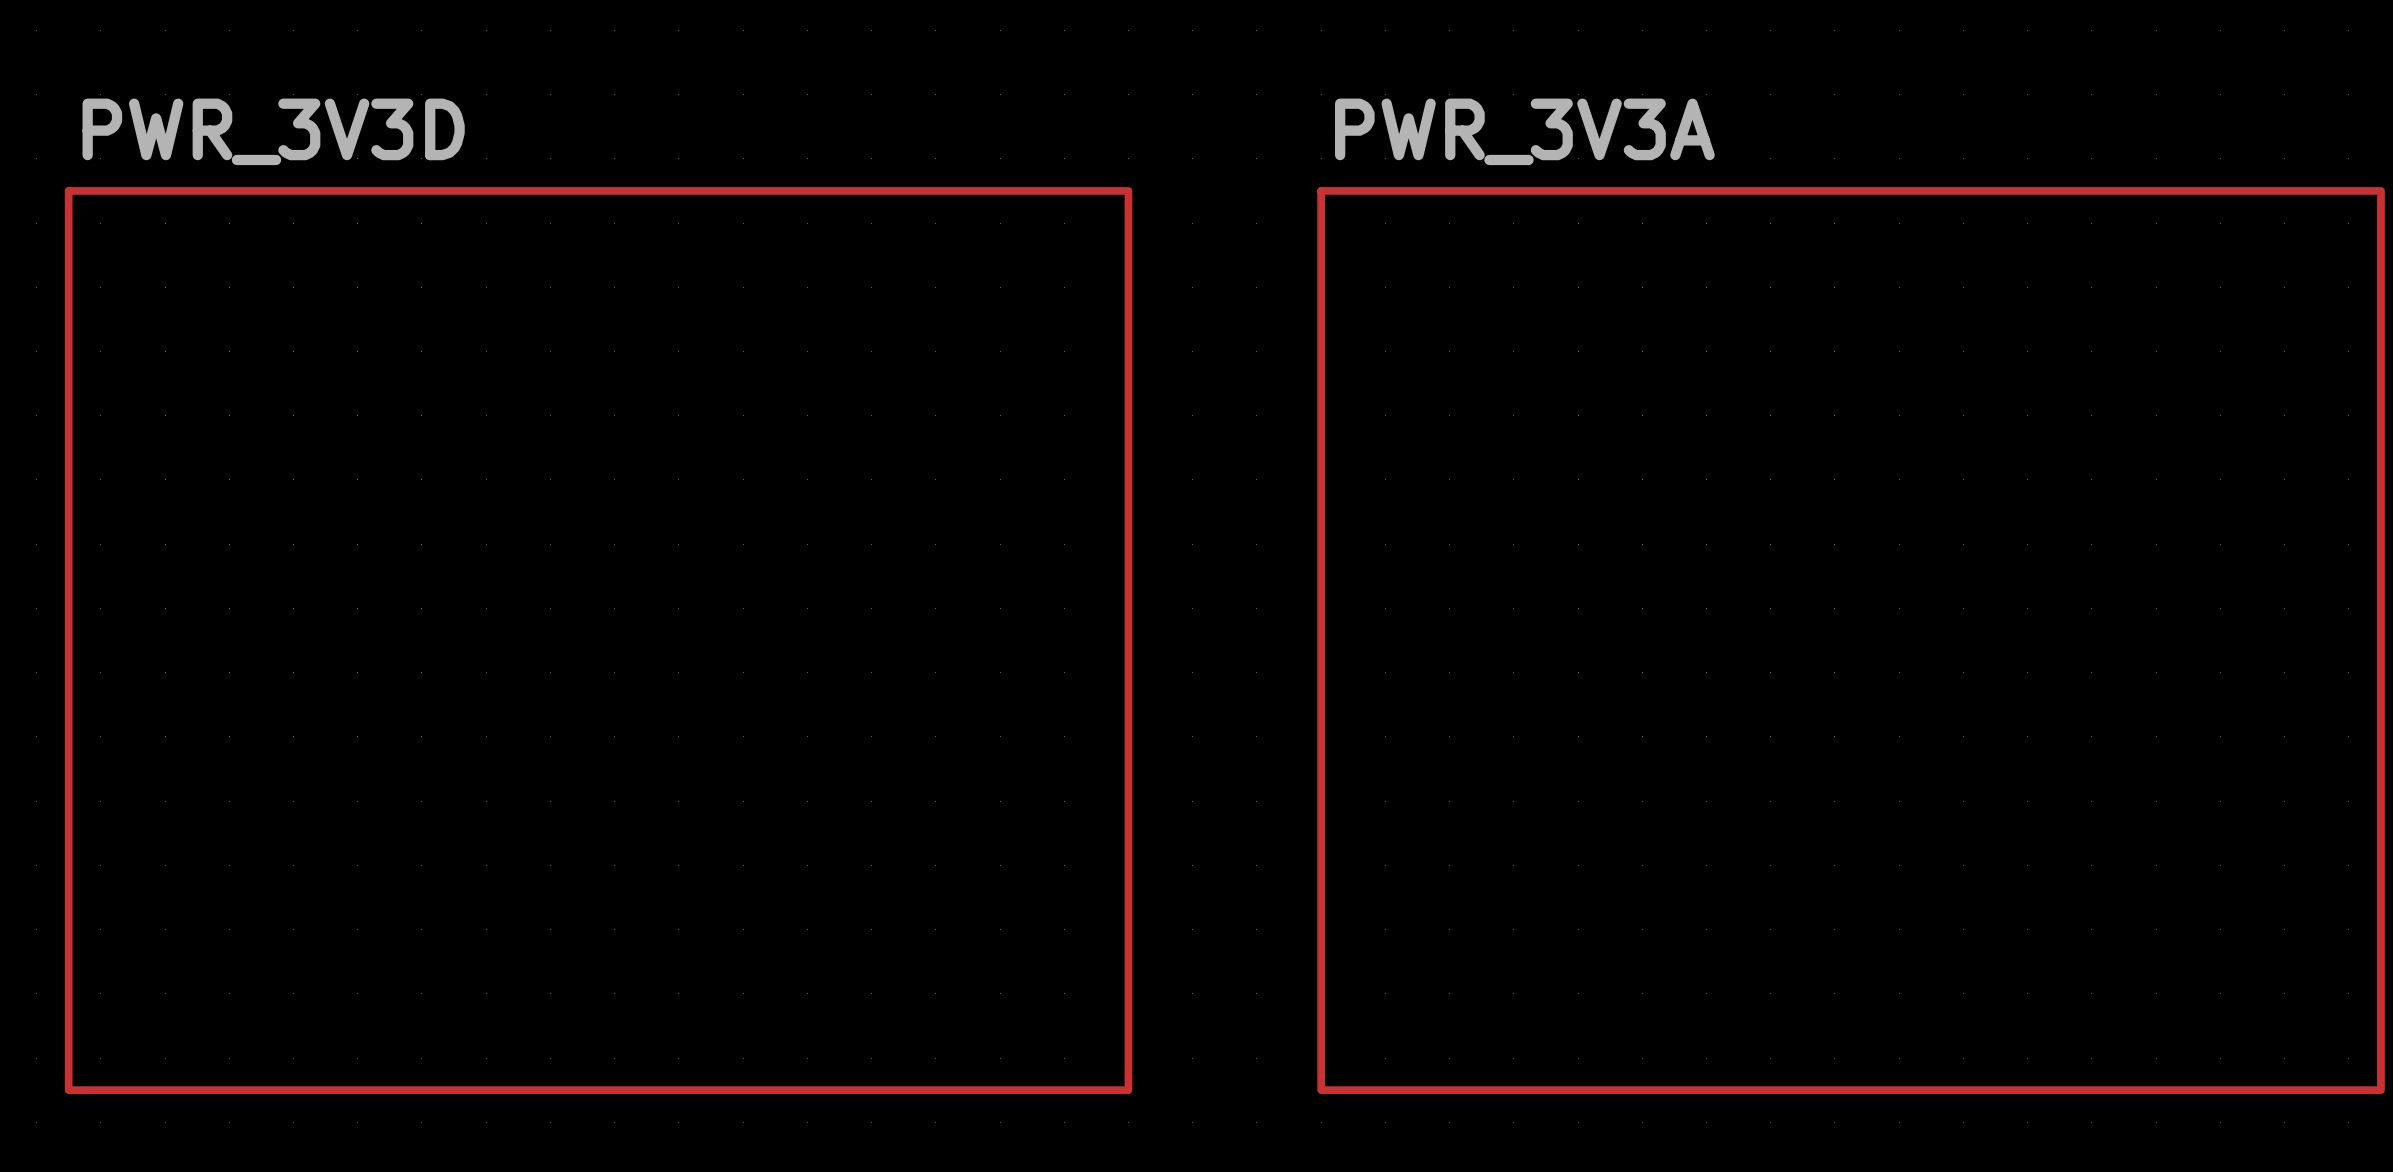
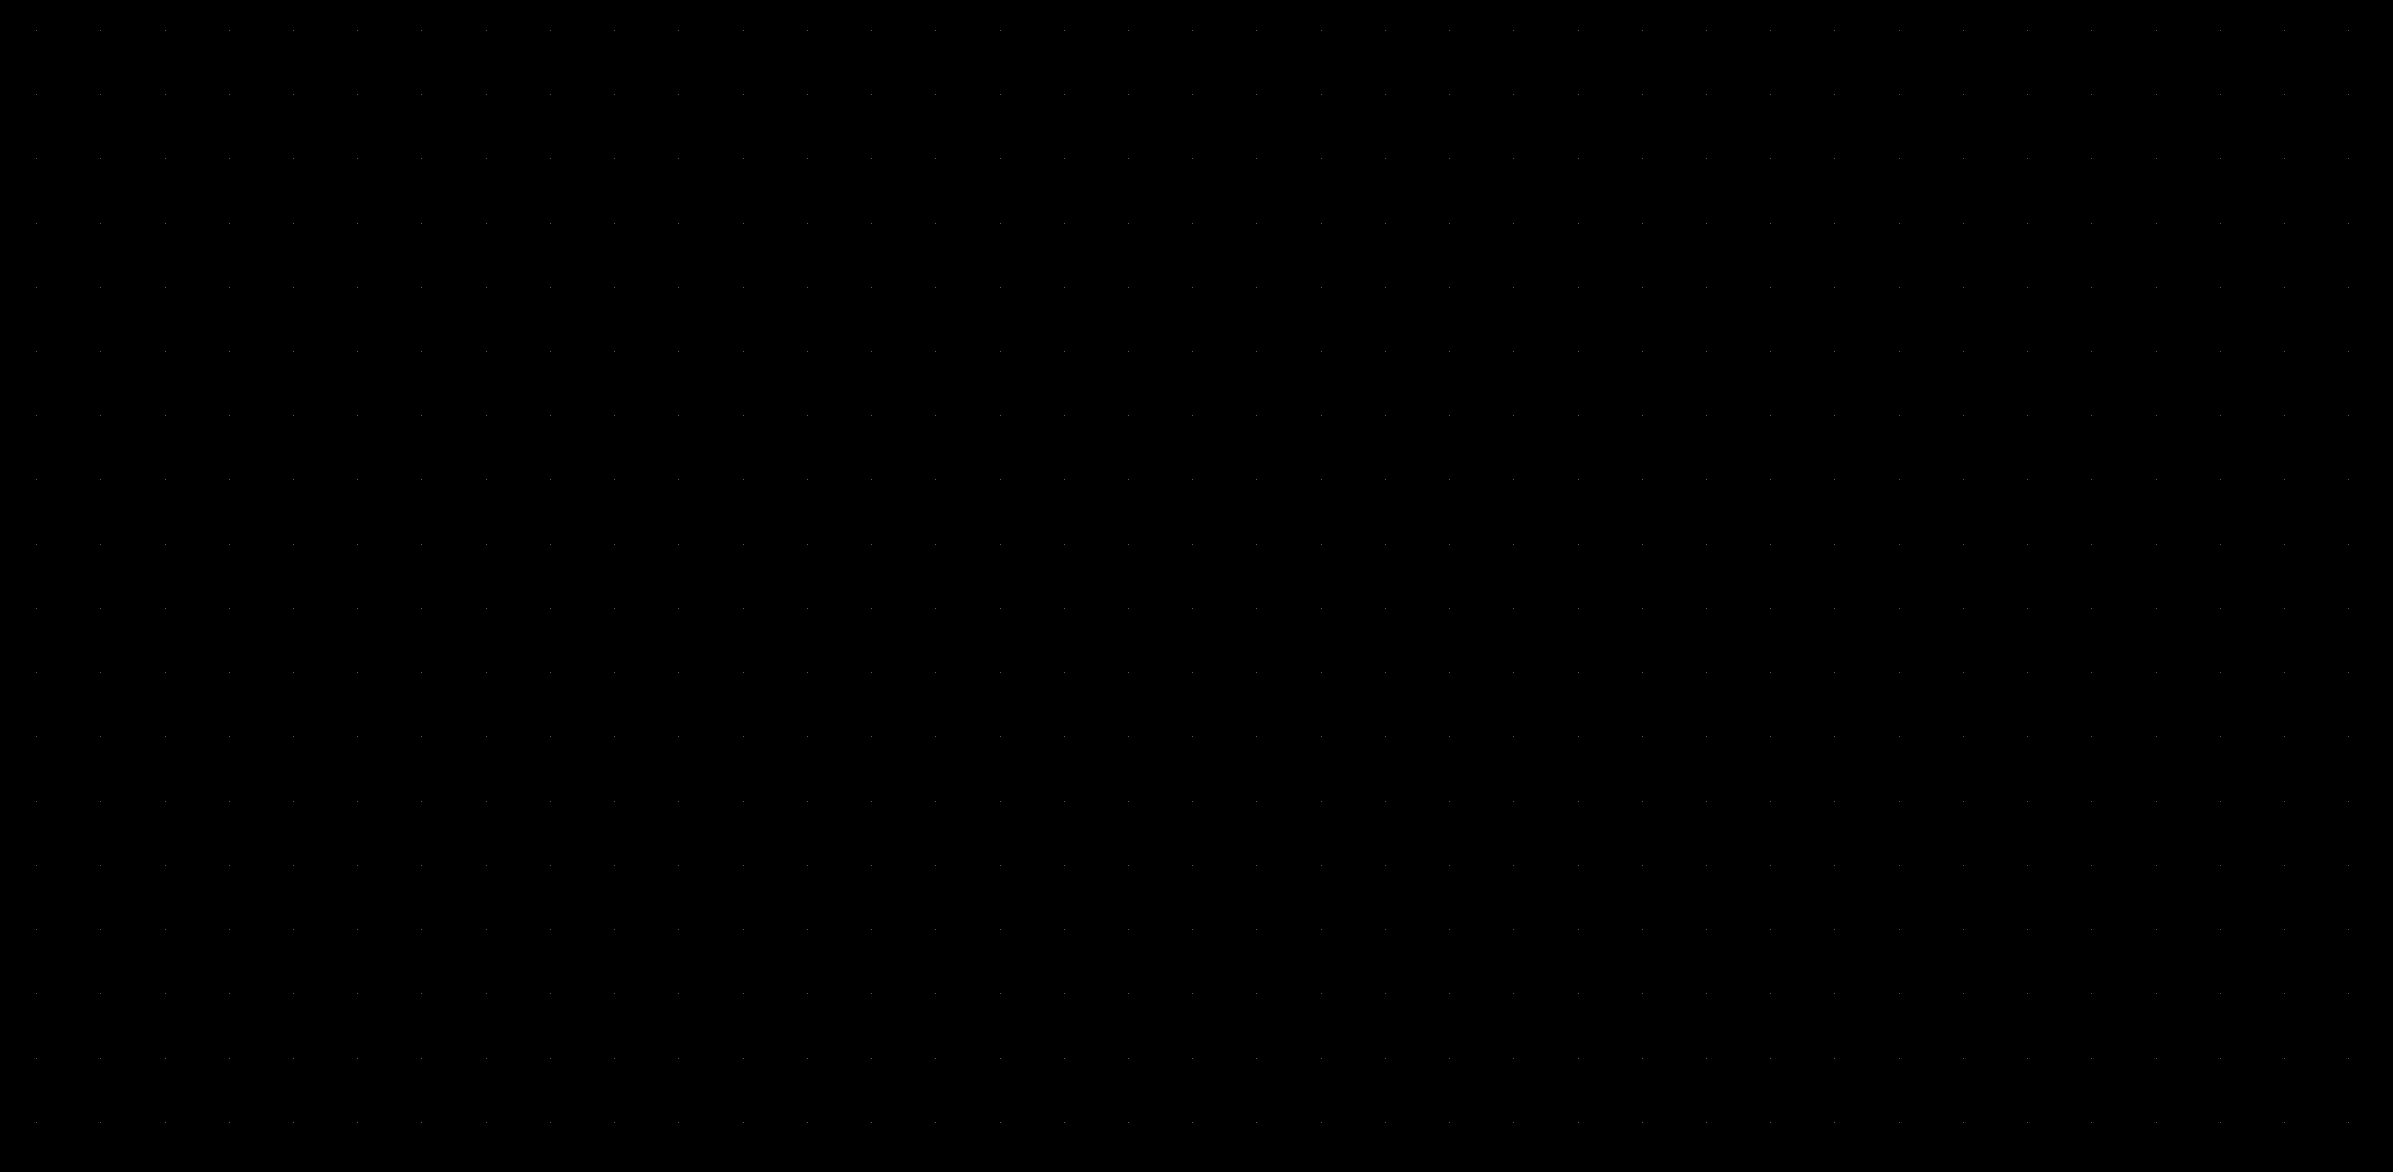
sheet PWR_3V3D: (598, 640) -> none
sheet PWR_3V3A: (1851, 640) -> none

